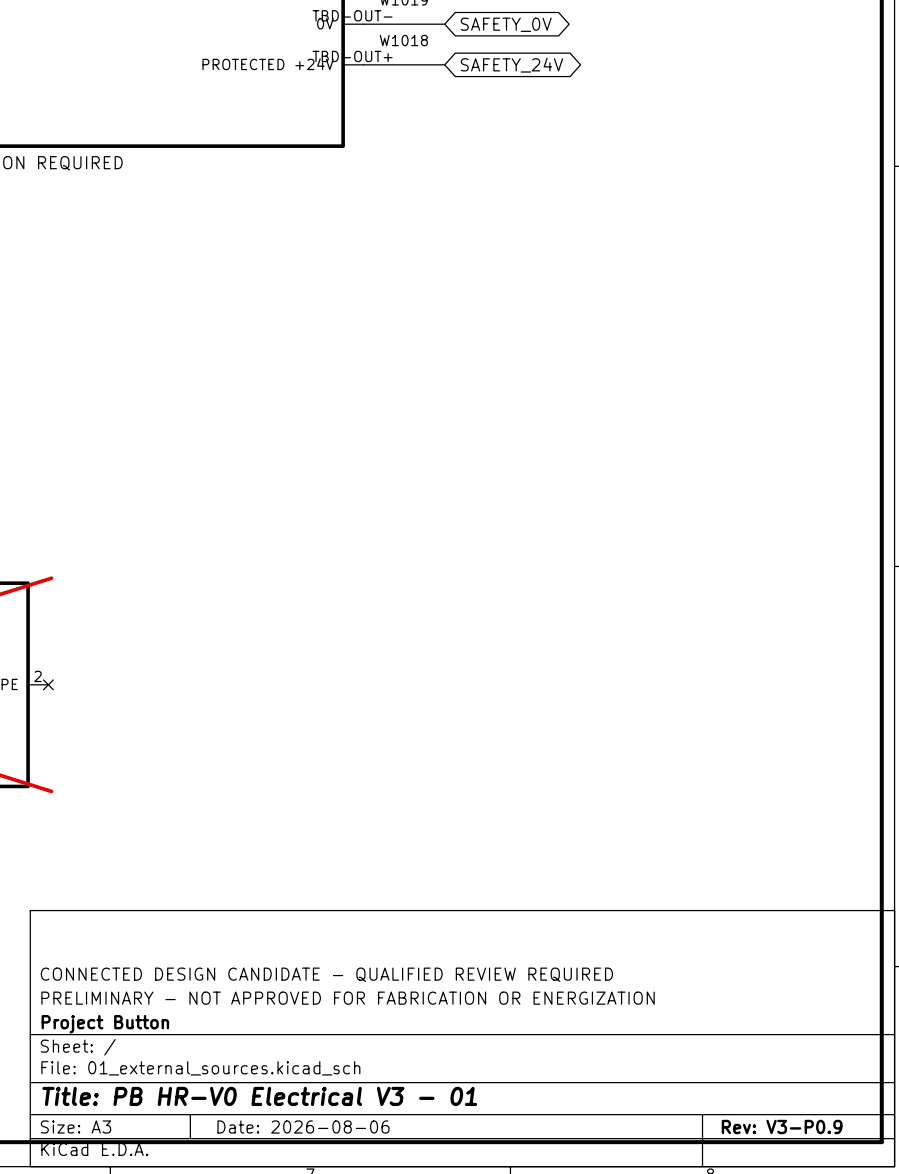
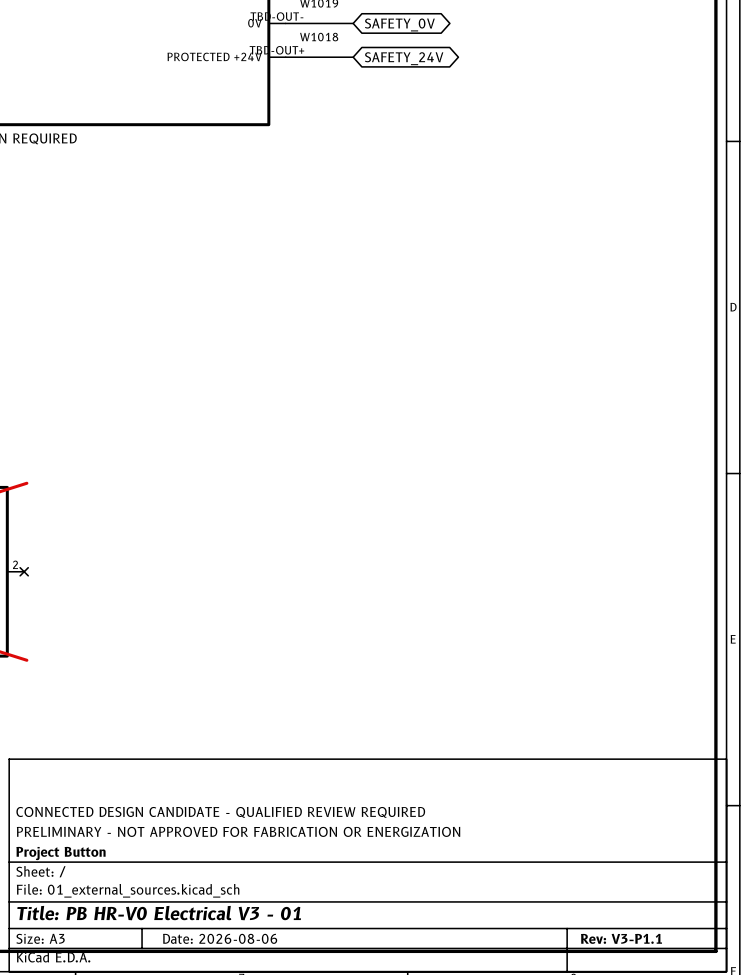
title block: Rev: V3-P0.9 (782, 1126) -> Rev: V3-P1.1 (621, 938)

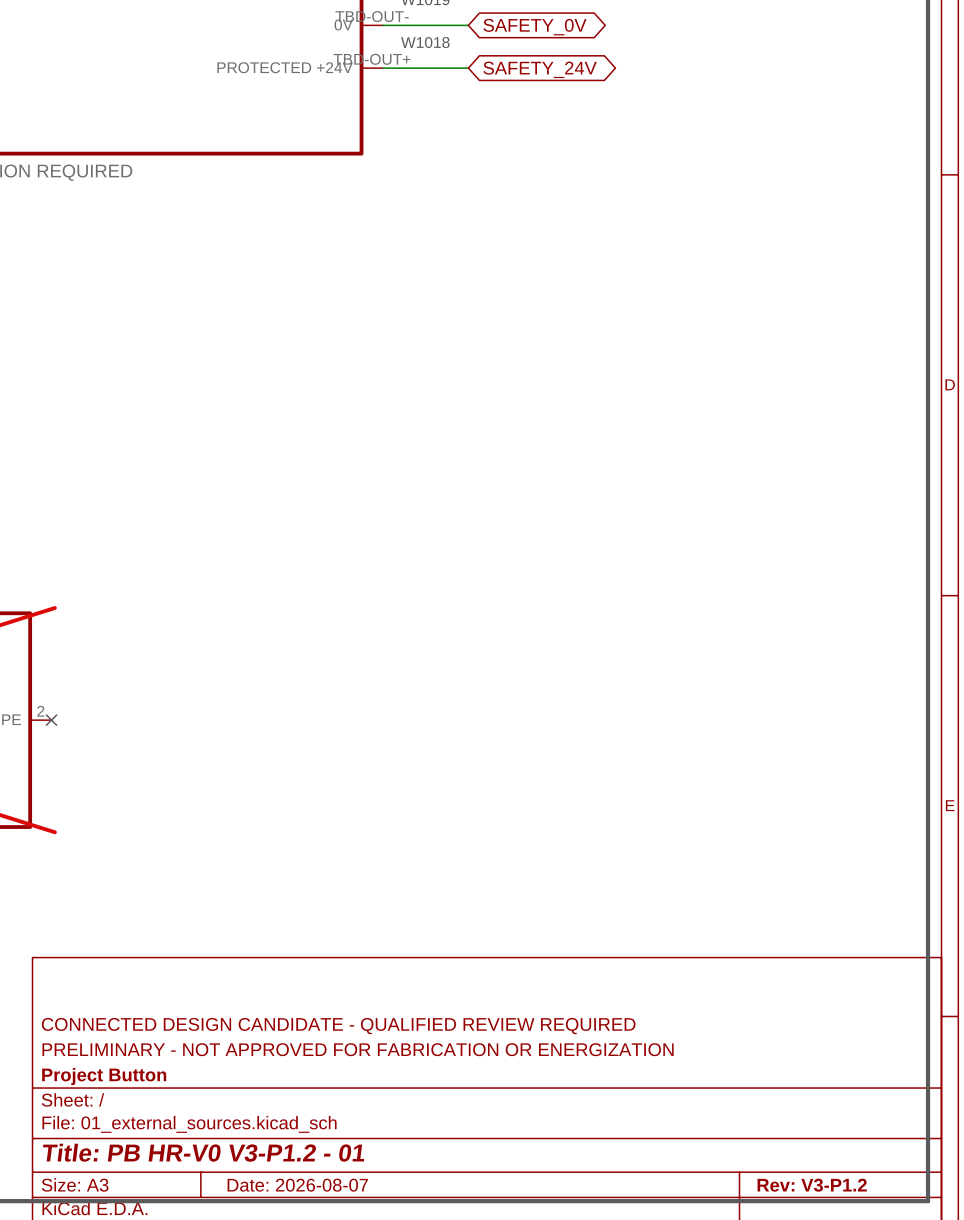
title block: Title: PB HR-V0 Electrical V3 - 01 (159, 913) -> Title: PB HR-V0 V3-P1.2 - 01 (203, 1152)
title block: Date: 2026-08-06 (220, 938) -> Date: 2026-08-07 (297, 1185)
title block: Rev: V3-P1.1 (621, 938) -> Rev: V3-P1.2 (812, 1185)

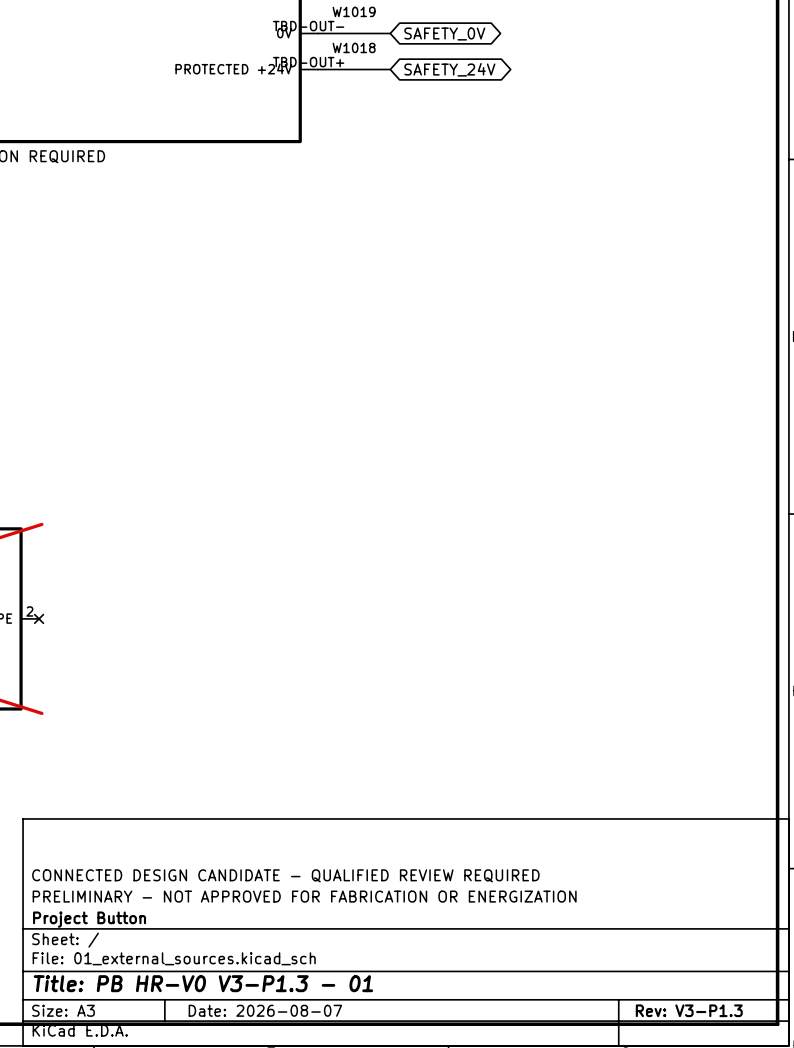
title block: Title: PB HR-V0 V3-P1.2 - 01 (203, 1152) -> Title: PB HR-V0 V3-P1.3 - 01 (203, 983)
title block: Rev: V3-P1.2 (812, 1185) -> Rev: V3-P1.3 (689, 1010)

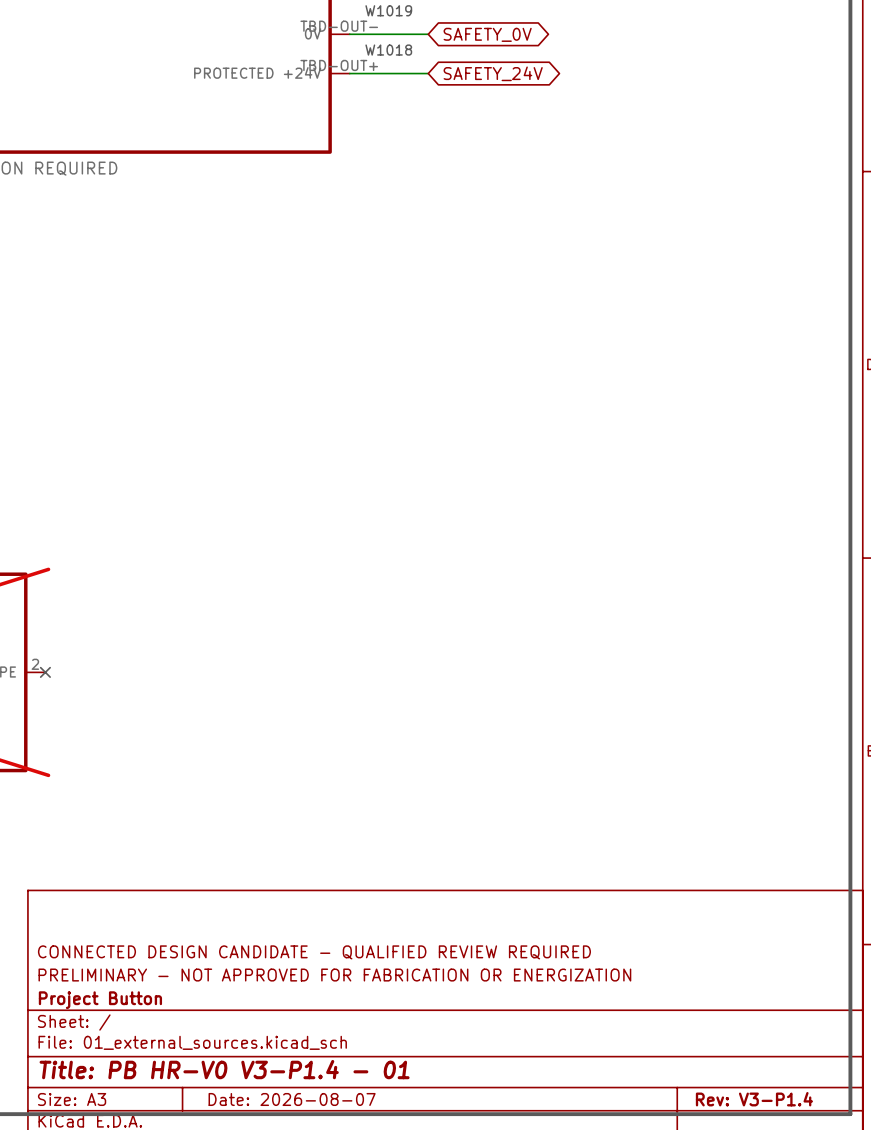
title block: Title: PB HR-V0 V3-P1.3 - 01 (203, 983) -> Title: PB HR-V0 V3-P1.4 - 01 (224, 1069)
title block: Rev: V3-P1.3 (689, 1010) -> Rev: V3-P1.4 (754, 1099)

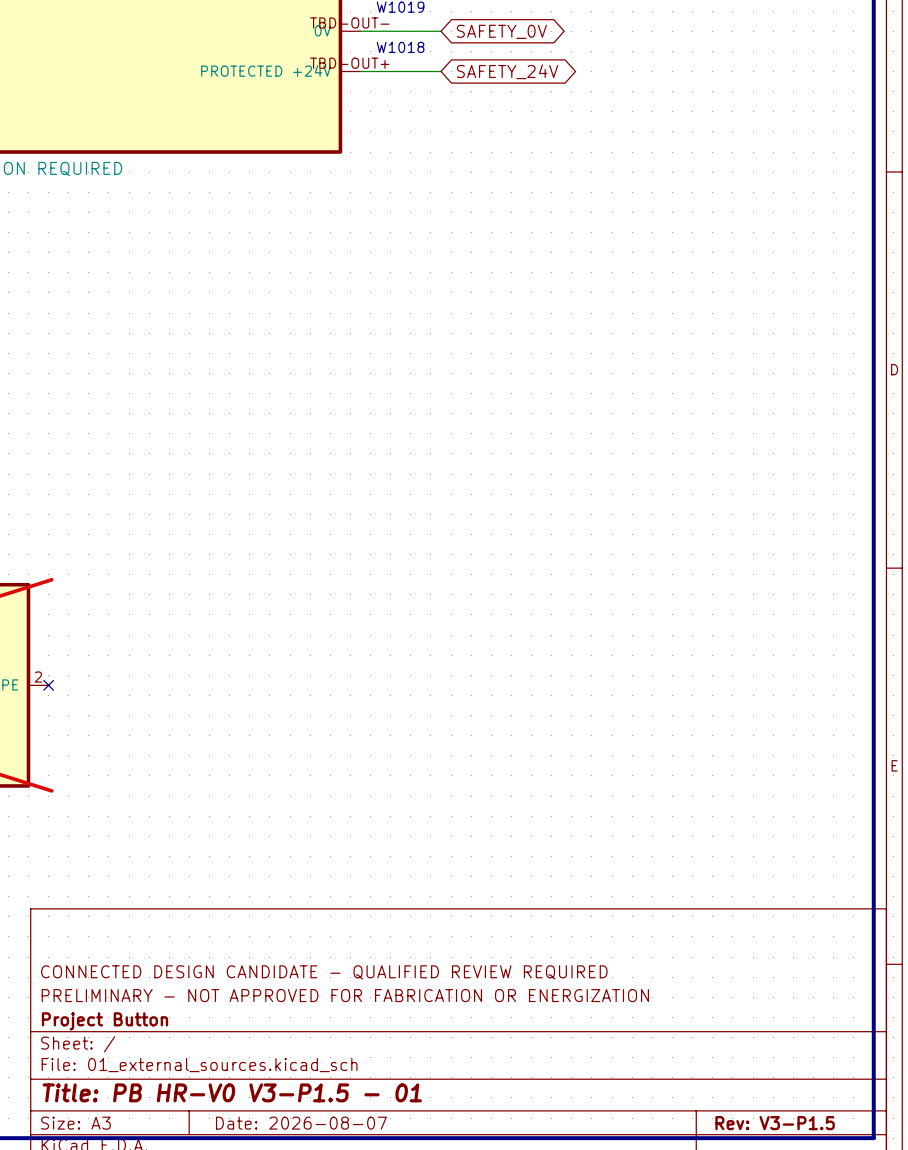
title block: Title: PB HR-V0 V3-P1.4 - 01 (224, 1069) -> Title: PB HR-V0 V3-P1.5 - 01 (232, 1092)
title block: Rev: V3-P1.4 (754, 1099) -> Rev: V3-P1.5 (775, 1123)

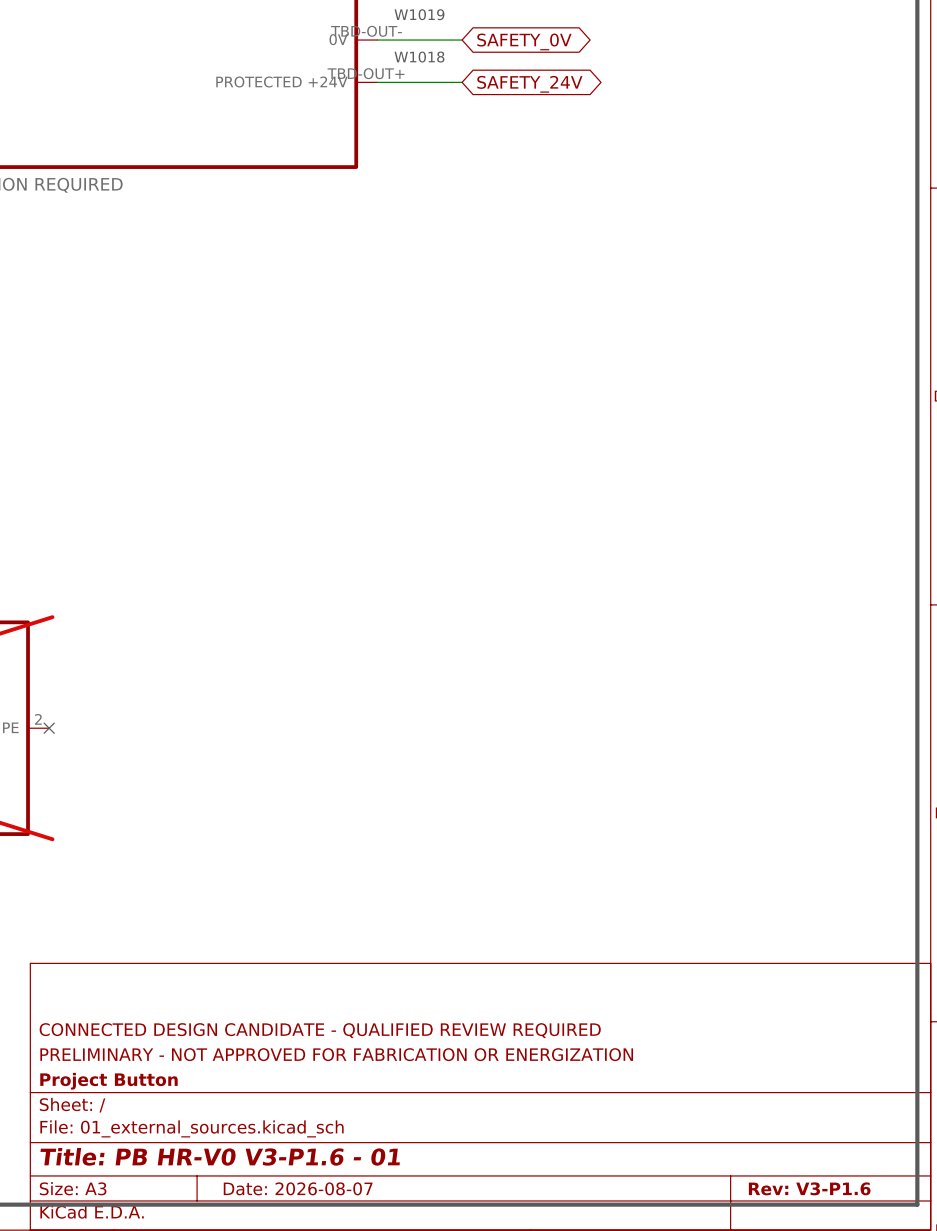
title block: Title: PB HR-V0 V3-P1.5 - 01 (232, 1092) -> Title: PB HR-V0 V3-P1.6 - 01 (220, 1156)
title block: Rev: V3-P1.5 (775, 1123) -> Rev: V3-P1.6 (809, 1188)

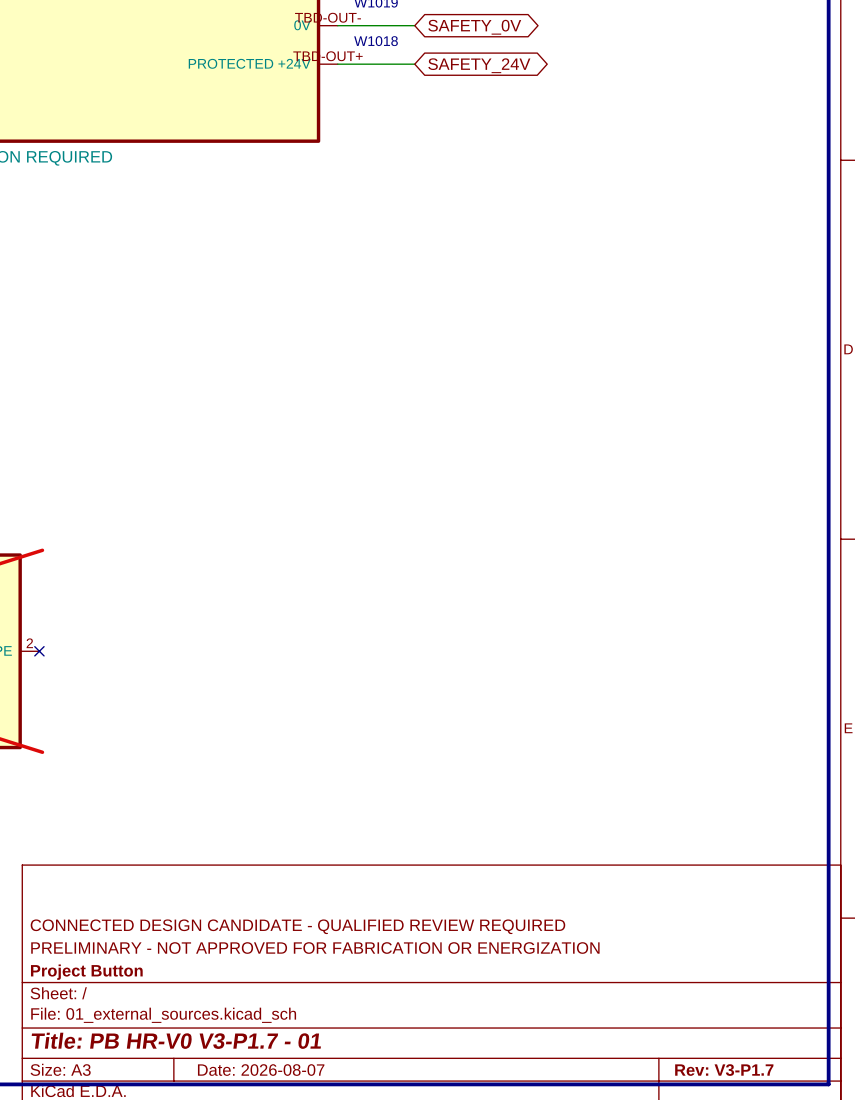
title block: Title: PB HR-V0 V3-P1.6 - 01 (220, 1156) -> Title: PB HR-V0 V3-P1.7 - 01 (176, 1040)
title block: Rev: V3-P1.6 (809, 1188) -> Rev: V3-P1.7 (724, 1070)

